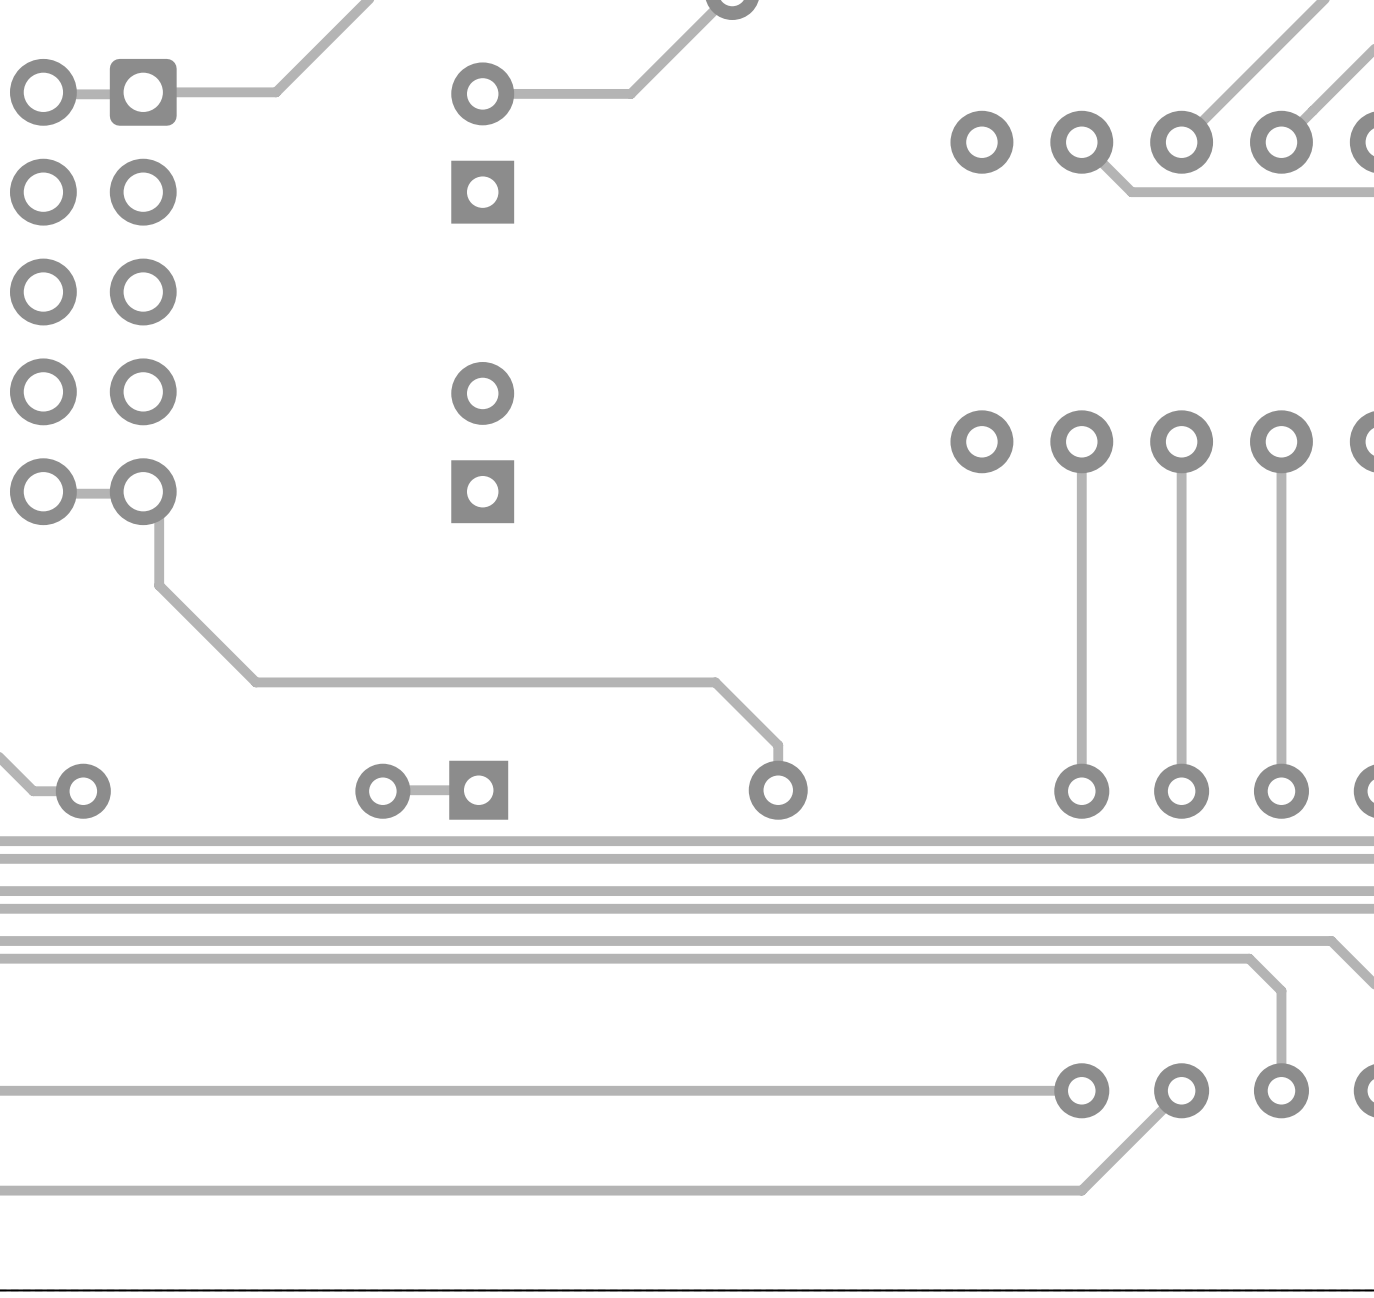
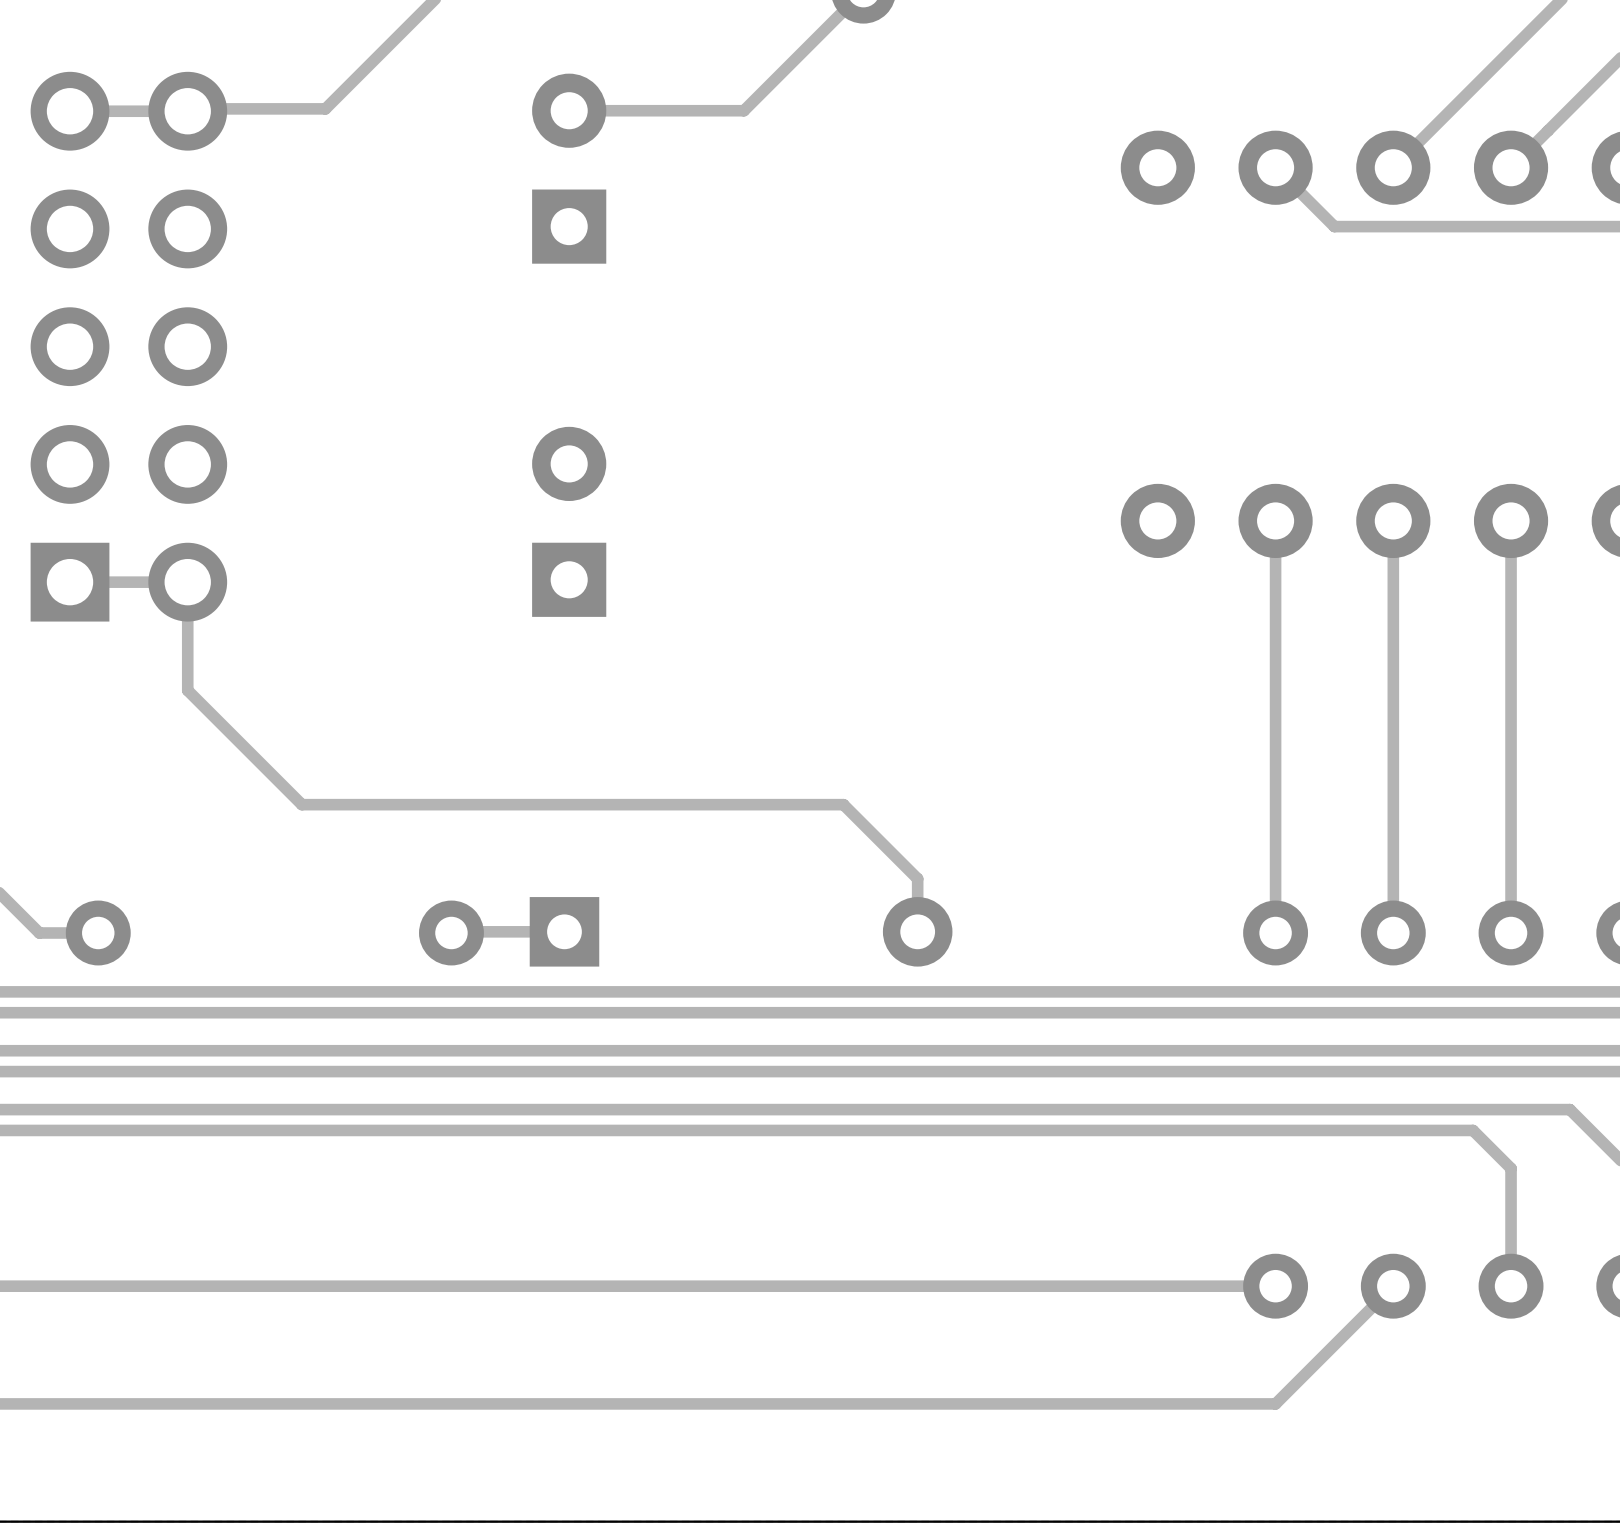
part footprint: [9, 58, 177, 526] -> [30, 71, 228, 622]

